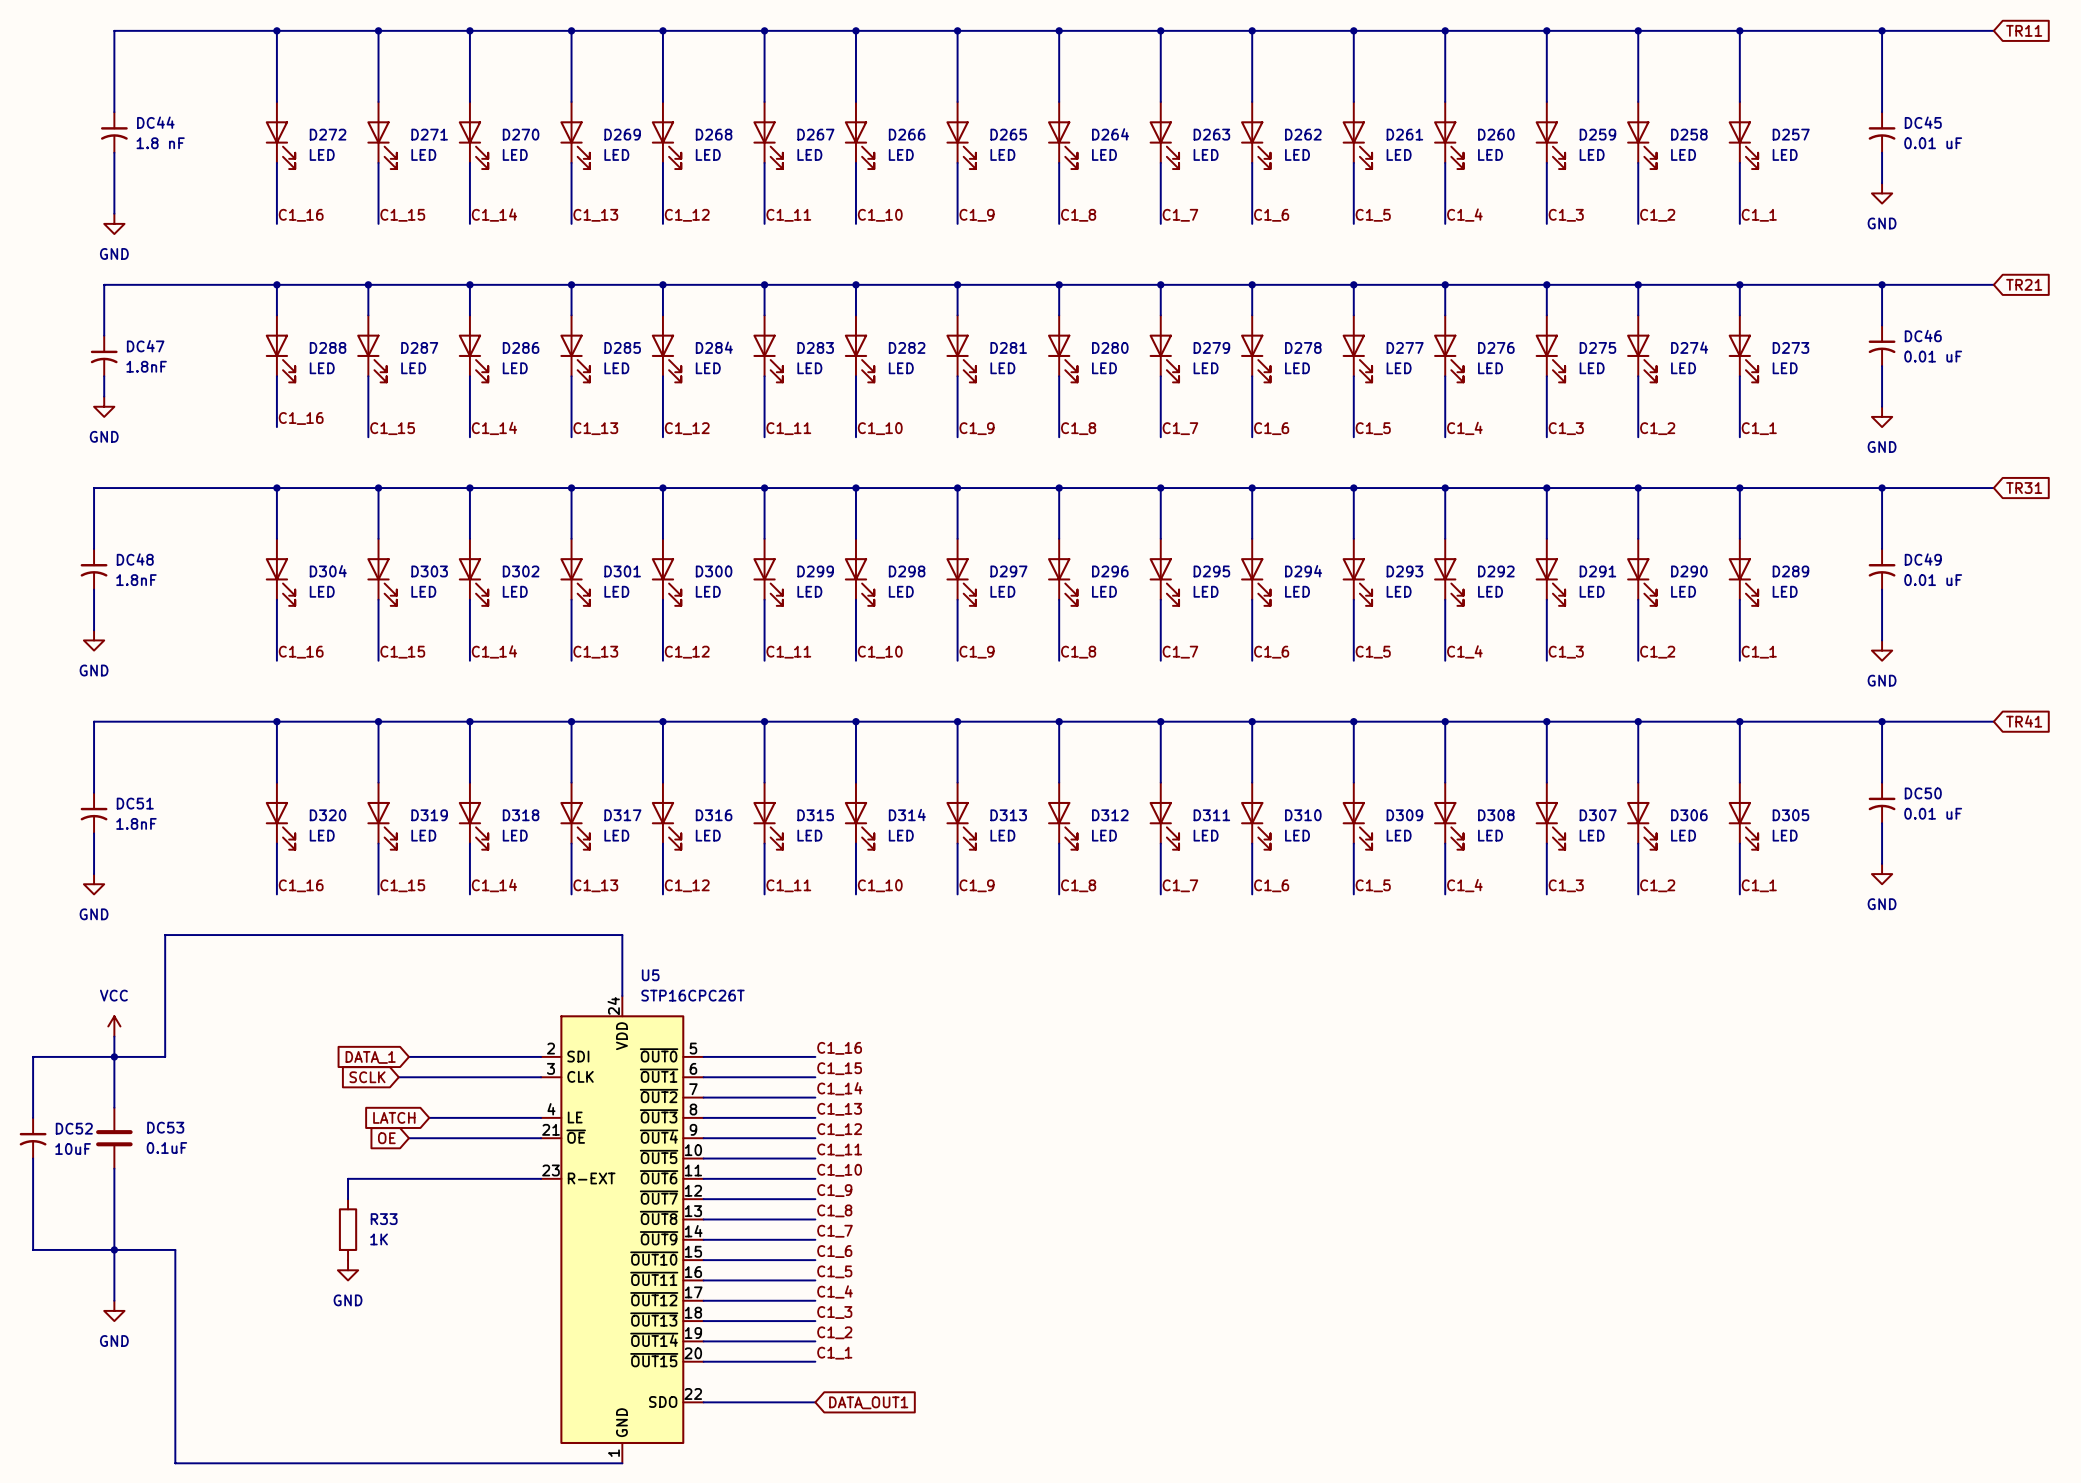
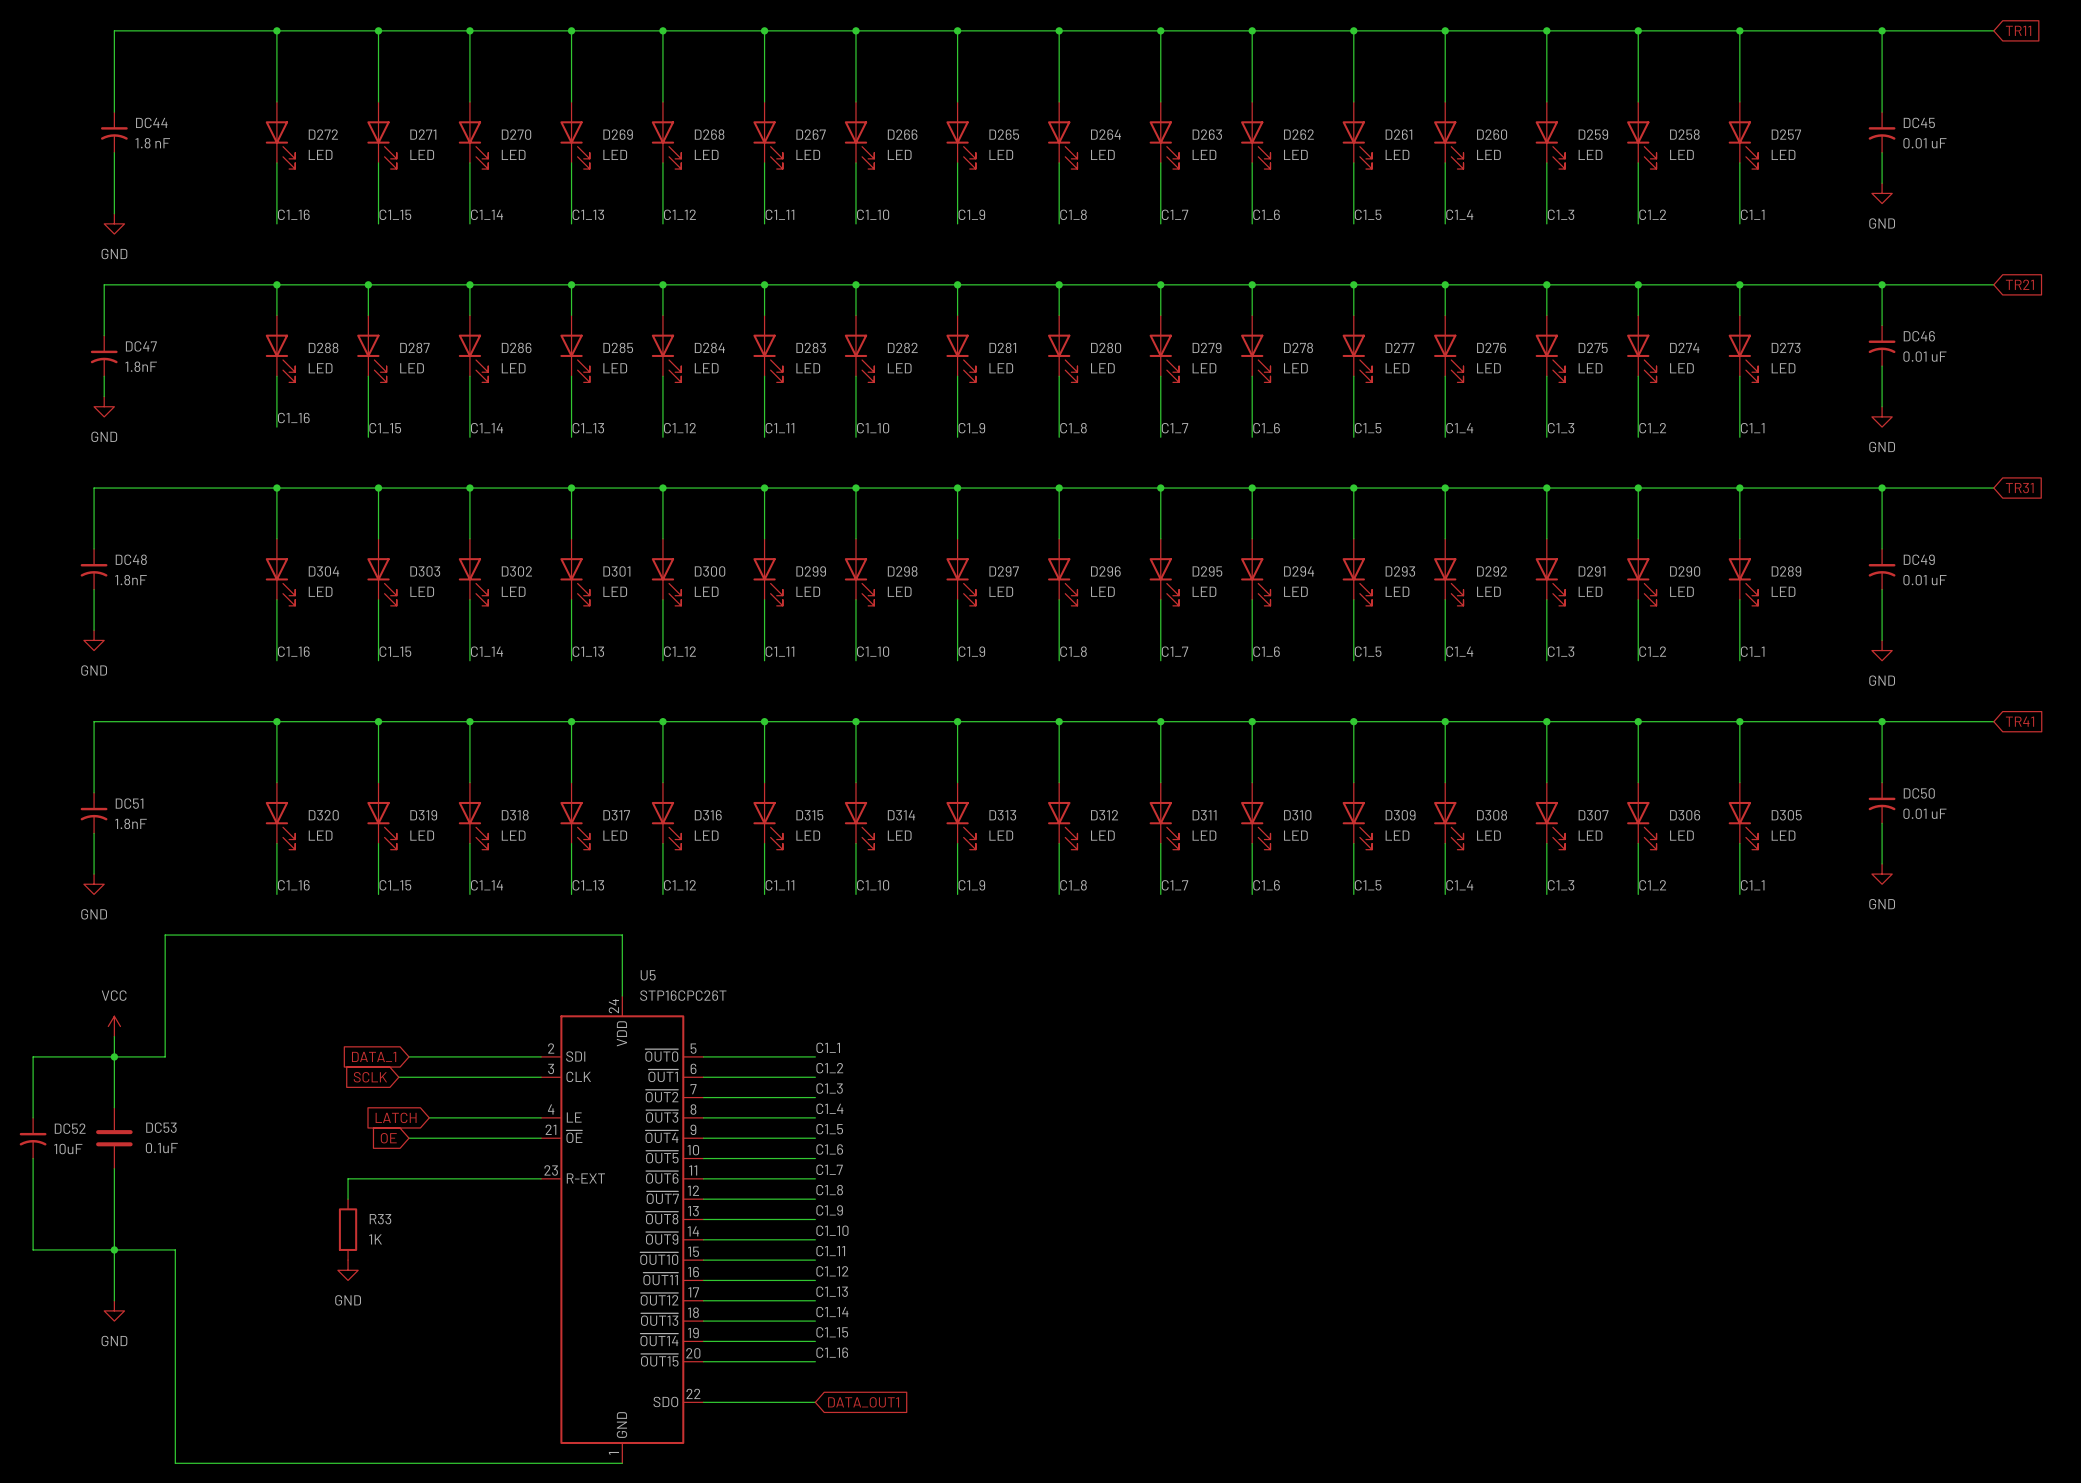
label: C1_16 (839, 1048) -> C1_1 (828, 1047)
label: C1_15 (839, 1068) -> C1_2 (829, 1068)
label: C1_14 (839, 1088) -> C1_3 (829, 1088)
label: C1_13 (839, 1109) -> C1_4 (829, 1108)
label: C1_12 (839, 1129) -> C1_5 (829, 1129)
label: C1_11 (839, 1149) -> C1_6 (829, 1149)
label: C1_10 (839, 1170) -> C1_7 (829, 1169)
label: C1_9 (834, 1190) -> C1_8 (829, 1190)
label: C1_8 (834, 1210) -> C1_9 (829, 1210)
label: C1_7 (835, 1231) -> C1_10 (832, 1230)
label: C1_6 (834, 1251) -> C1_11 (830, 1251)
label: C1_5 (834, 1271) -> C1_12 (832, 1271)
label: C1_4 (835, 1291) -> C1_13 (832, 1291)
label: C1_3 (834, 1312) -> C1_14 (832, 1312)
label: C1_2 (834, 1332) -> C1_15 (832, 1332)
label: C1_1 (834, 1353) -> C1_16 (832, 1352)

